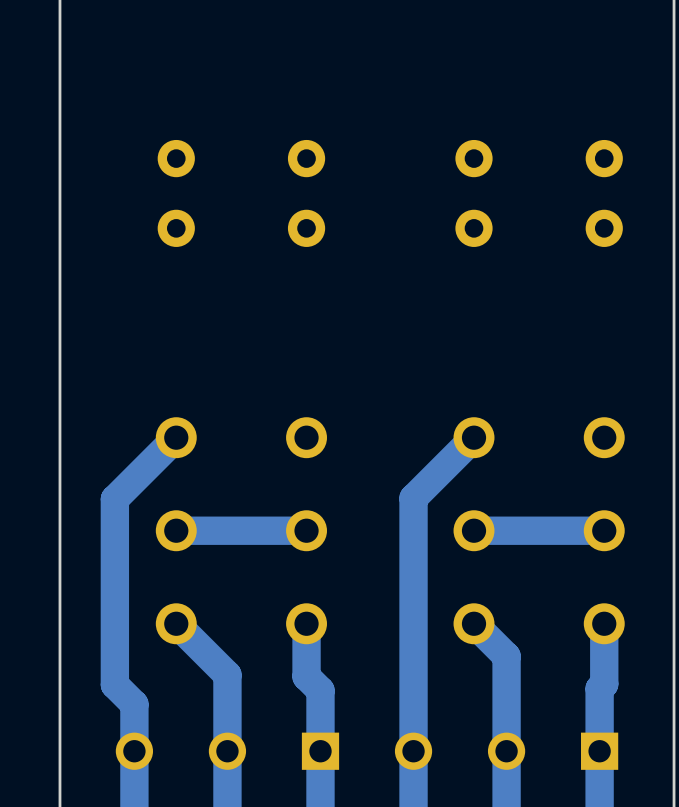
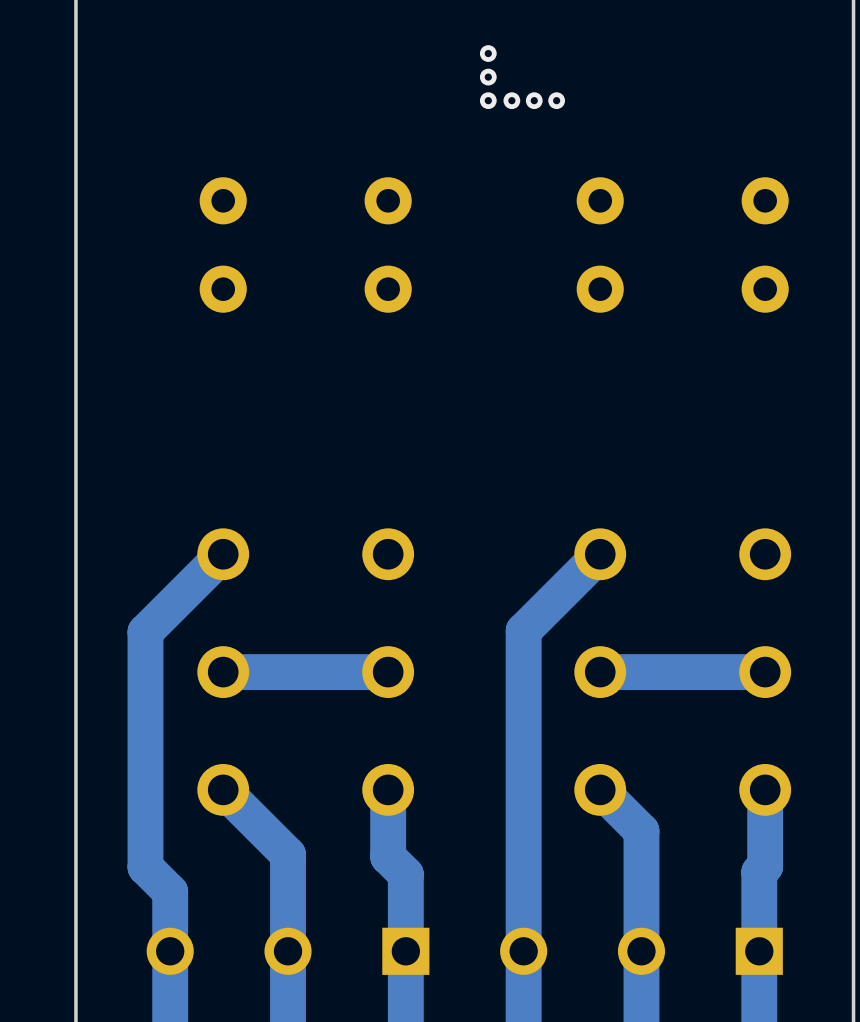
via: none -> (488, 53)
via: none -> (488, 77)
via: none -> (488, 100)
via: none -> (511, 100)
via: none -> (534, 100)
via: none -> (556, 100)

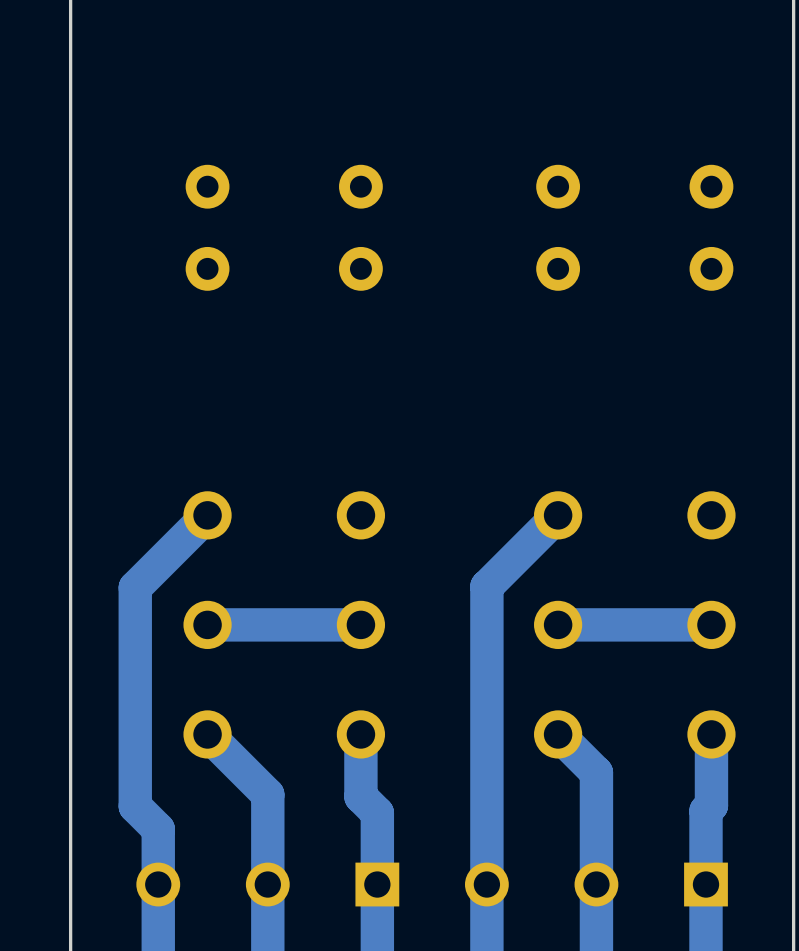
via: (488, 53) -> none
via: (488, 77) -> none
via: (488, 100) -> none
via: (511, 100) -> none
via: (534, 100) -> none
via: (556, 100) -> none

